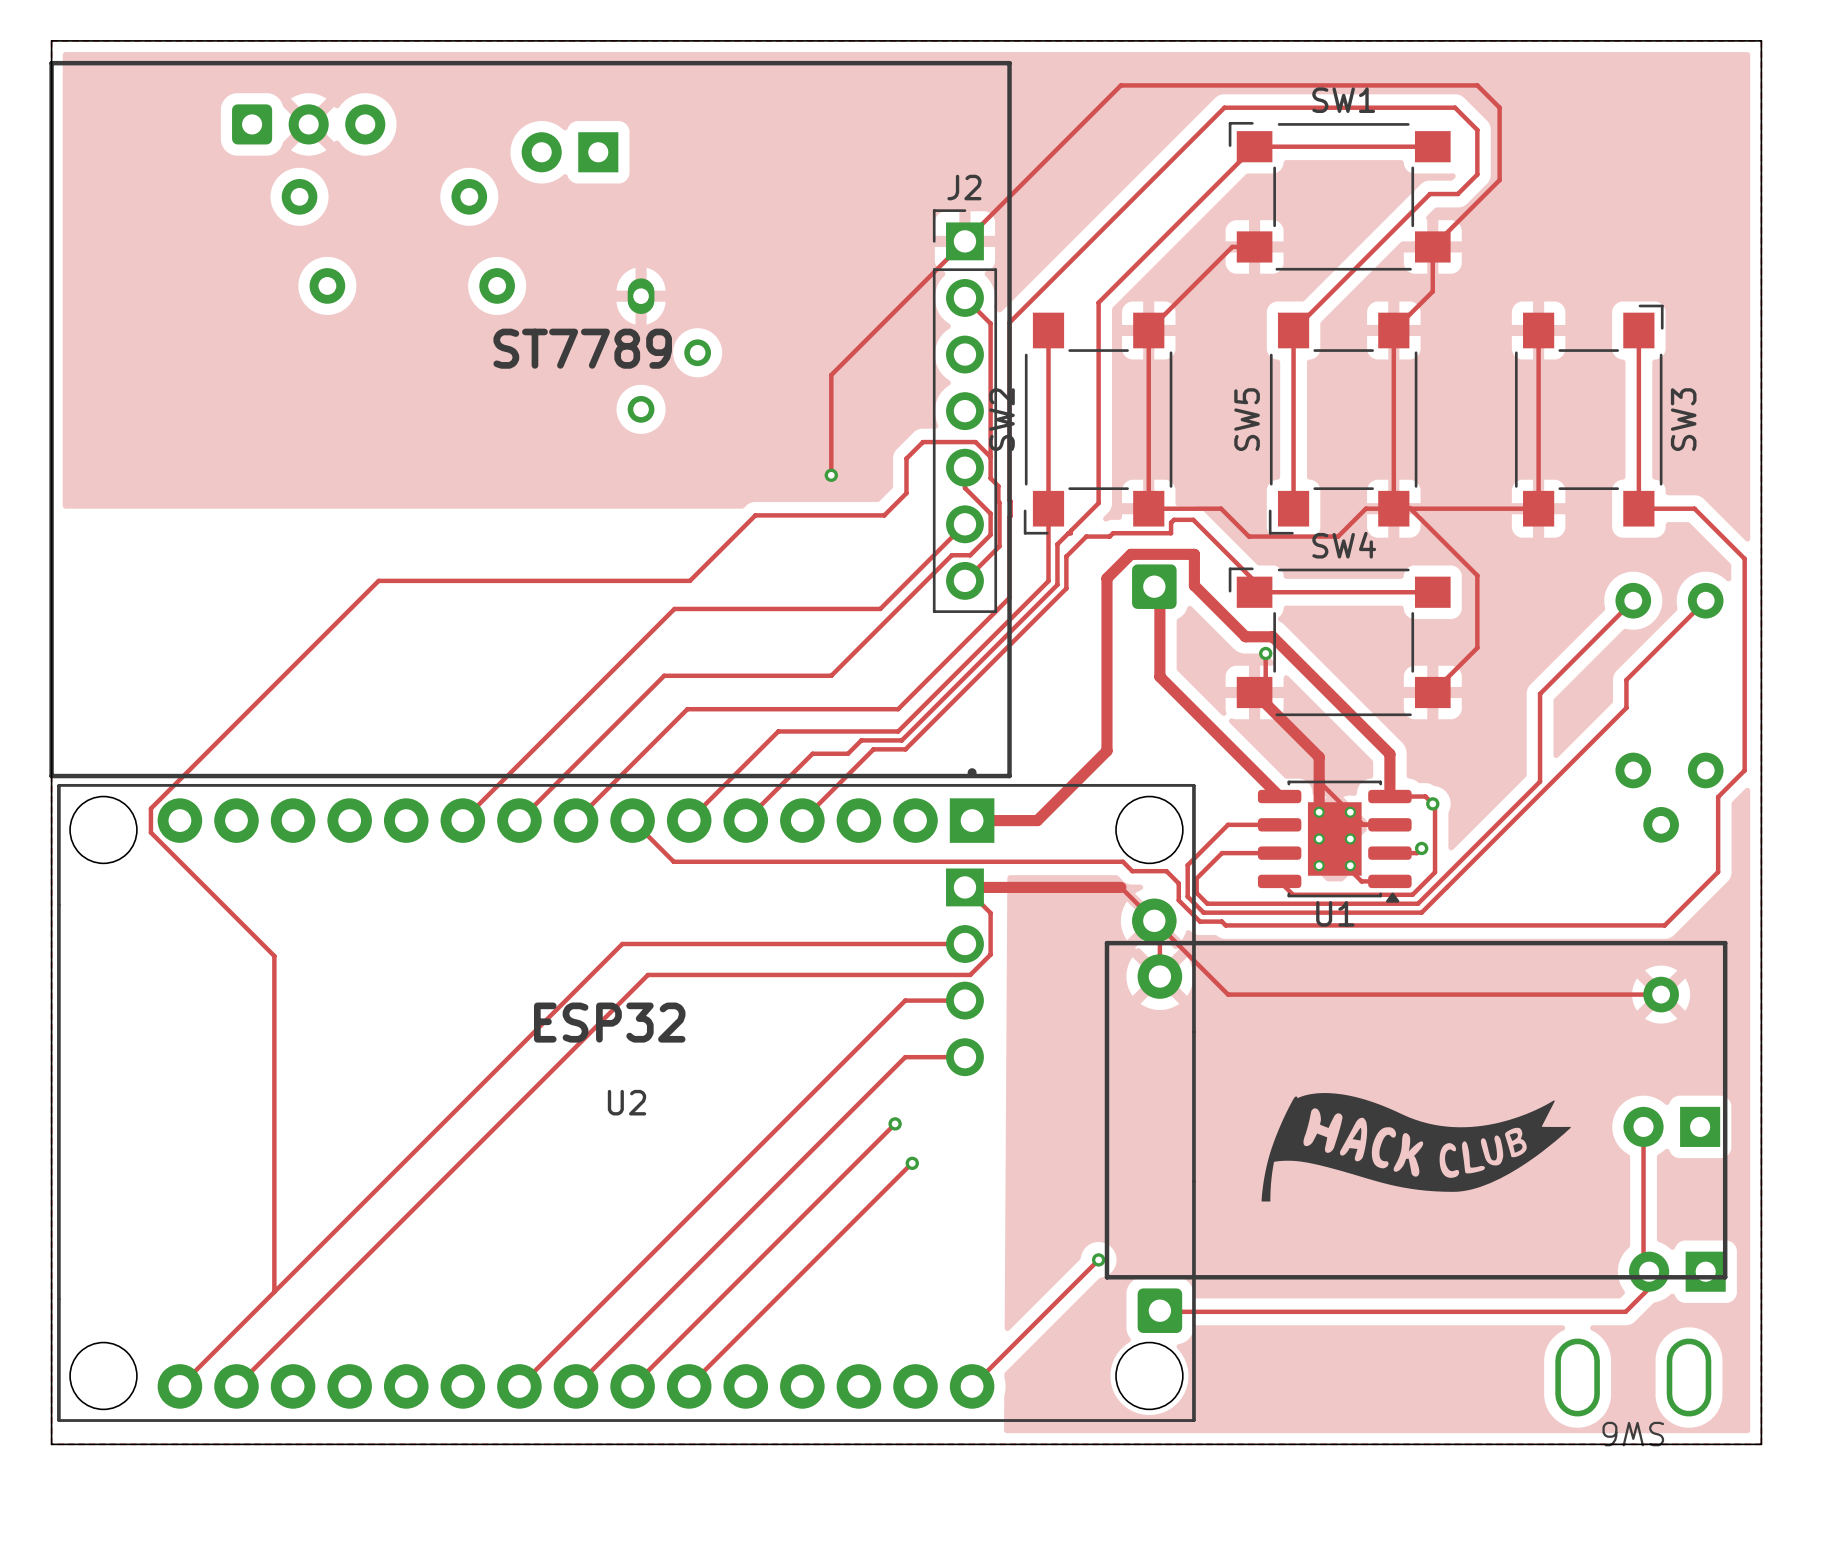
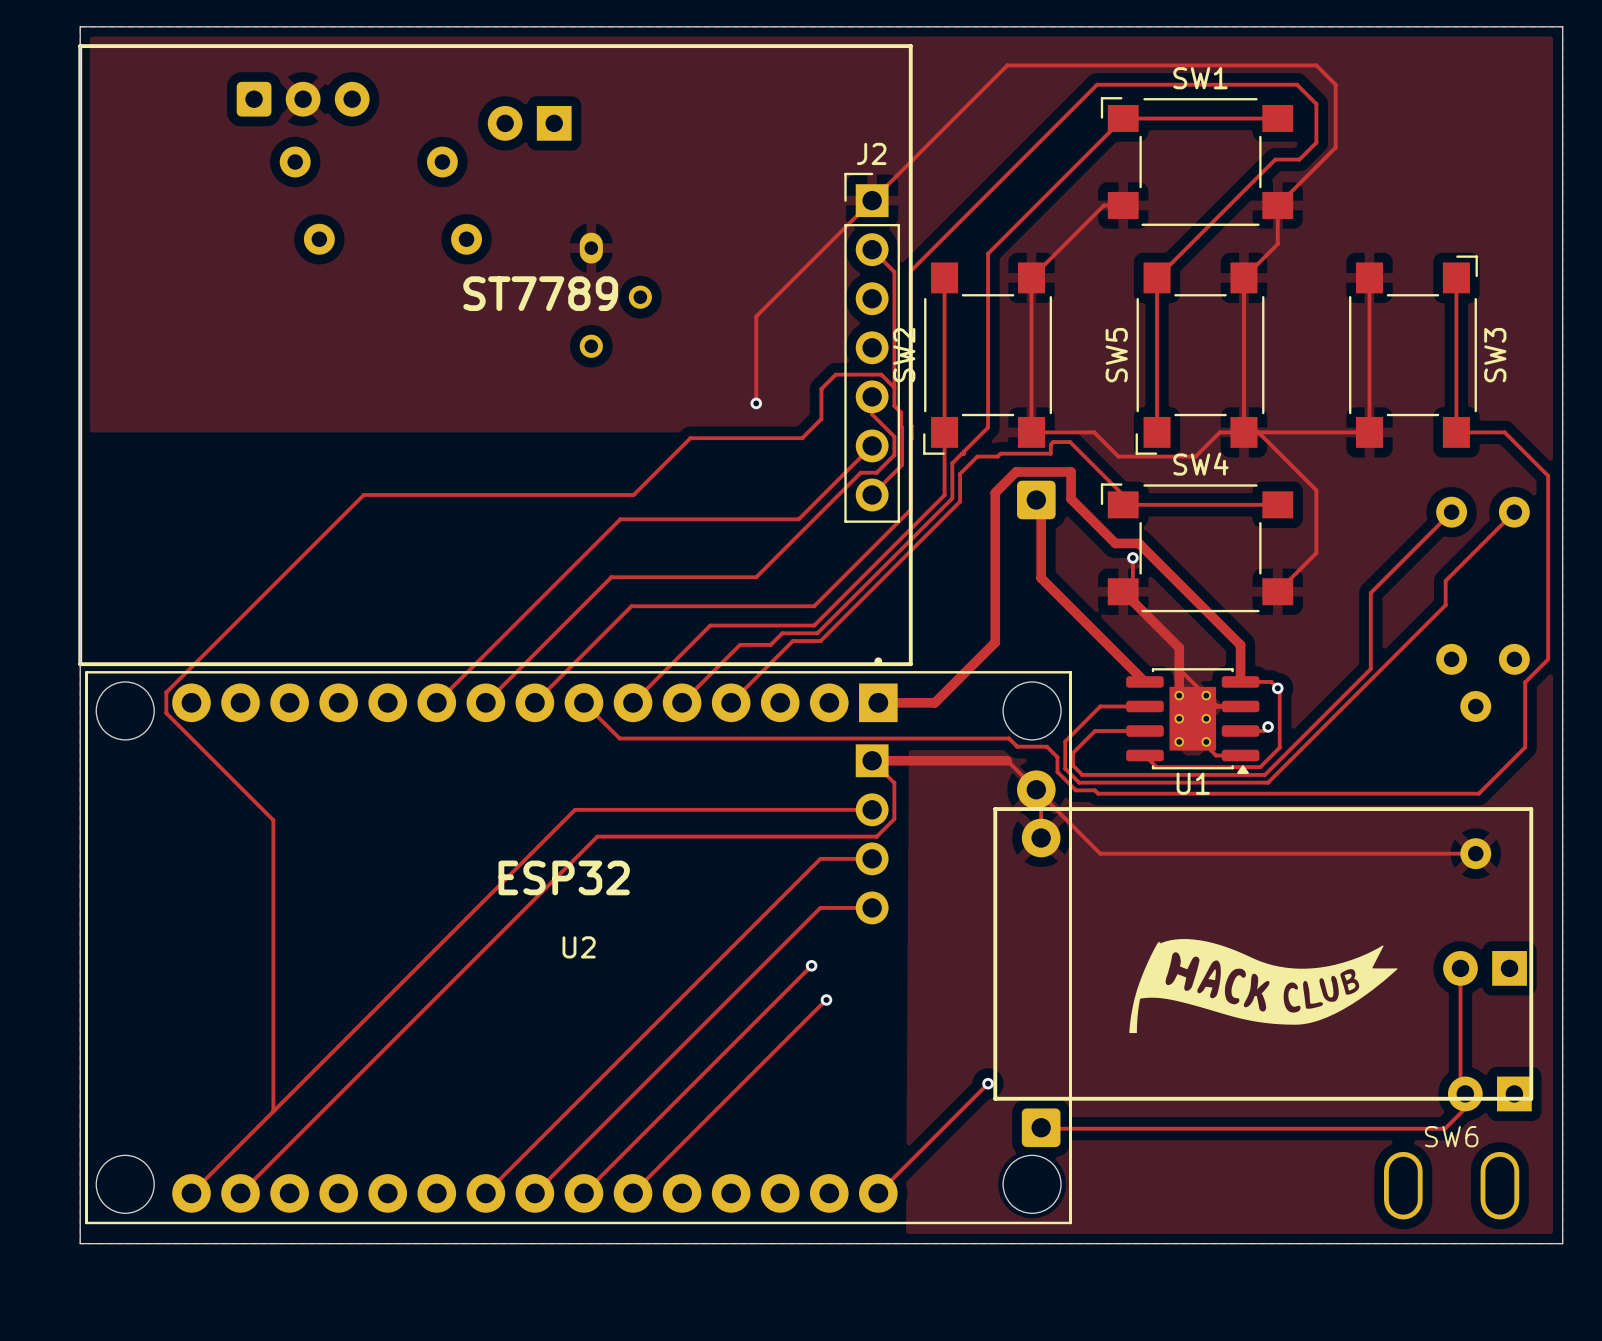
SW6 name rotation: 0° (1633, 1434) -> 180° (1451, 1136)
SW6 name position: SW6 (1633, 1434) -> SW6 (1451, 1136)

